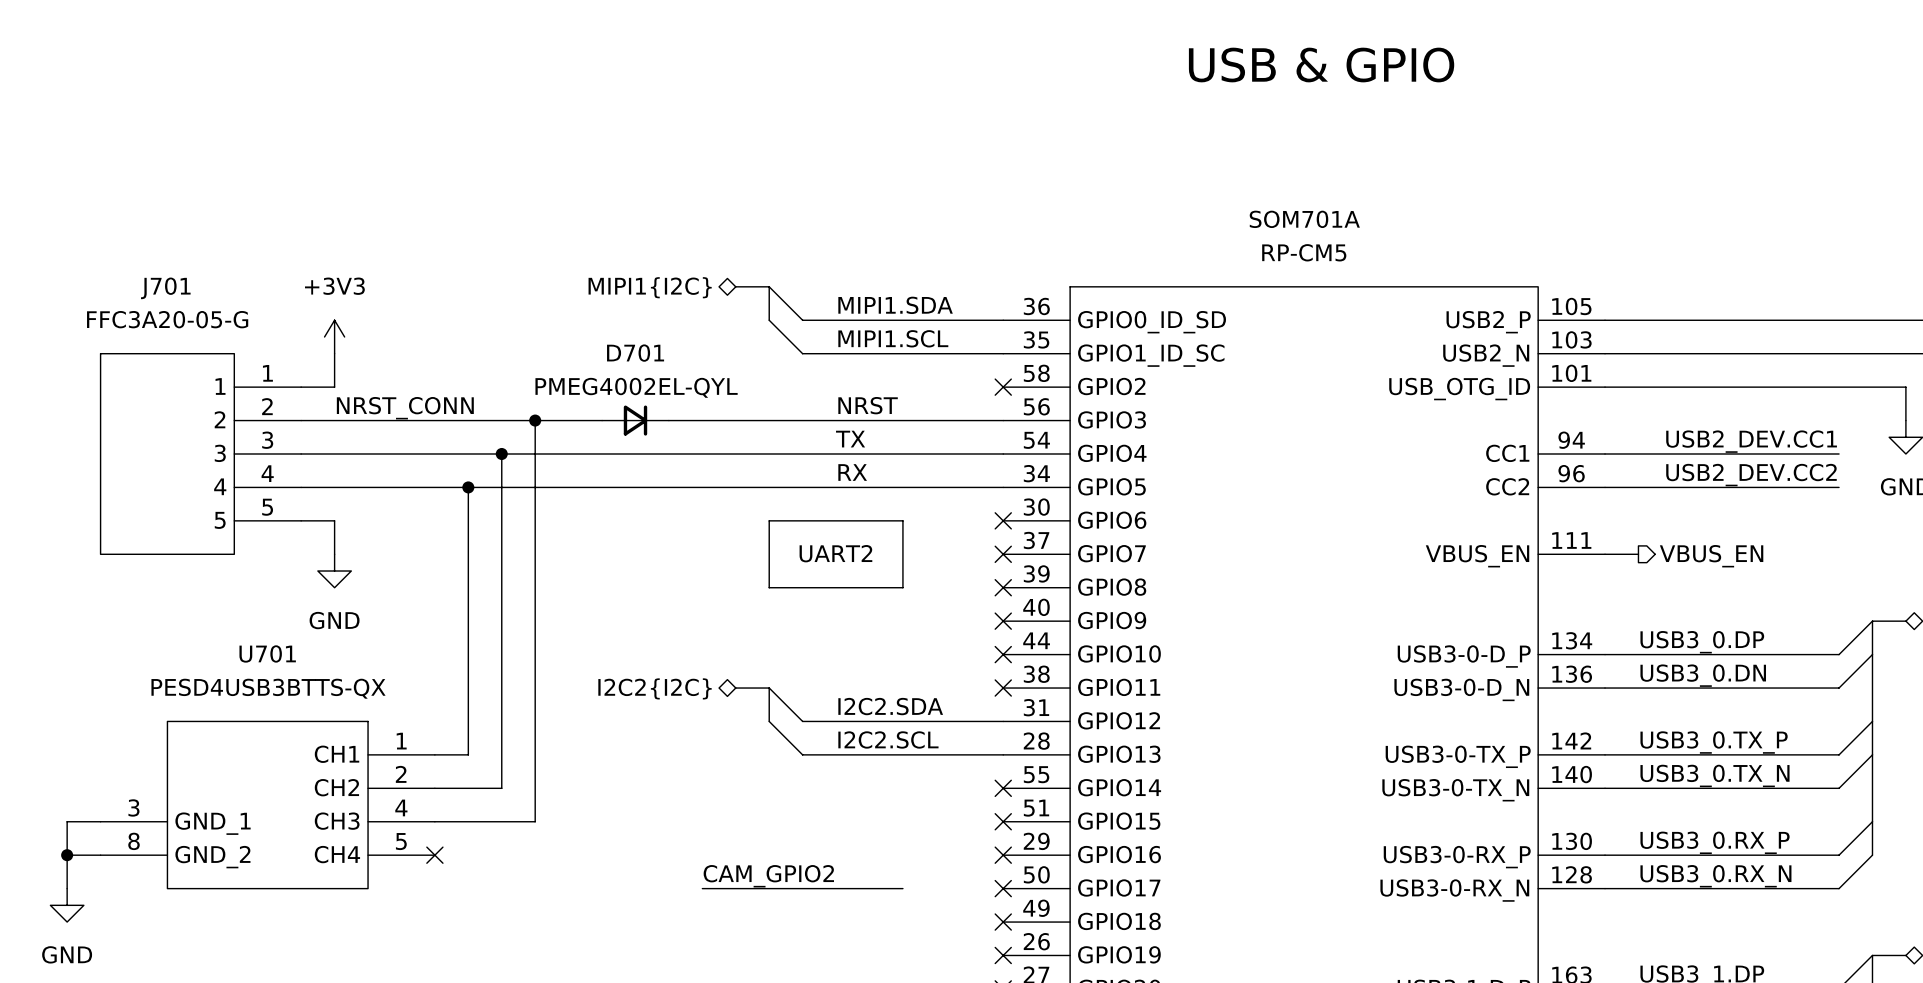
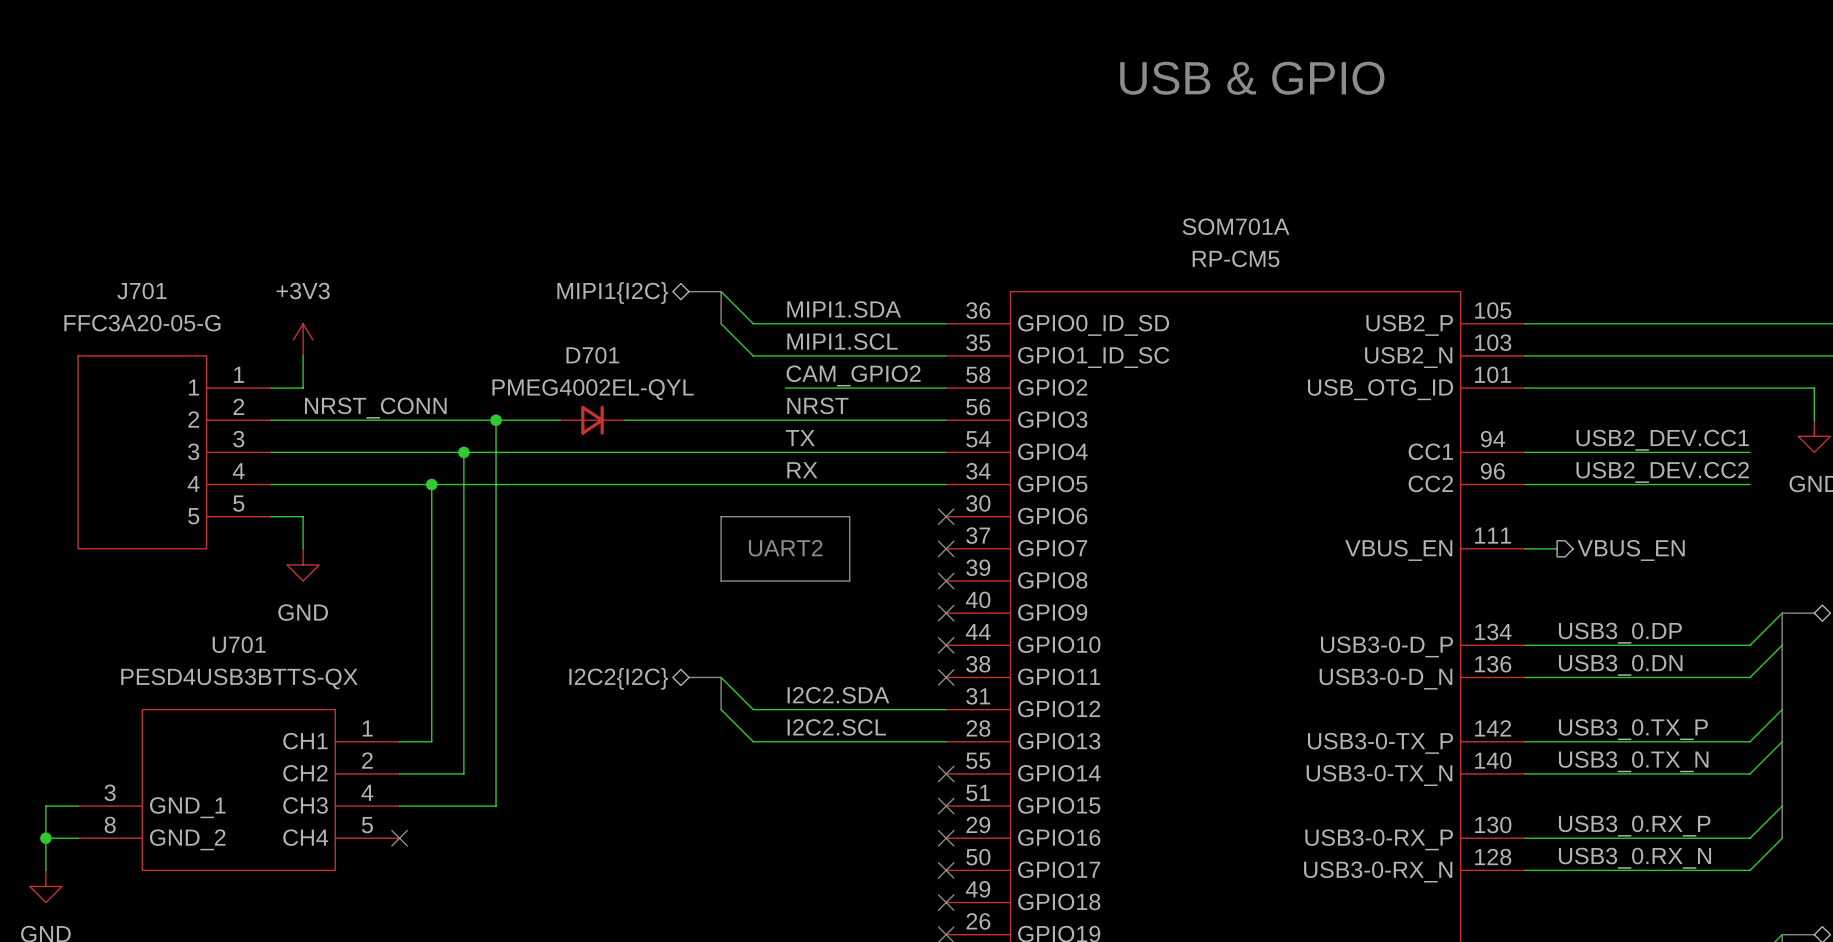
label: none -> CAM_GPIO2 (853, 375)
wire: none -> (785, 388) (946, 388)
no-connect mark: (1003, 387) -> none
label: CAM_GPIO2 (768, 876) -> none
wire: (702, 888) (902, 888) -> none

